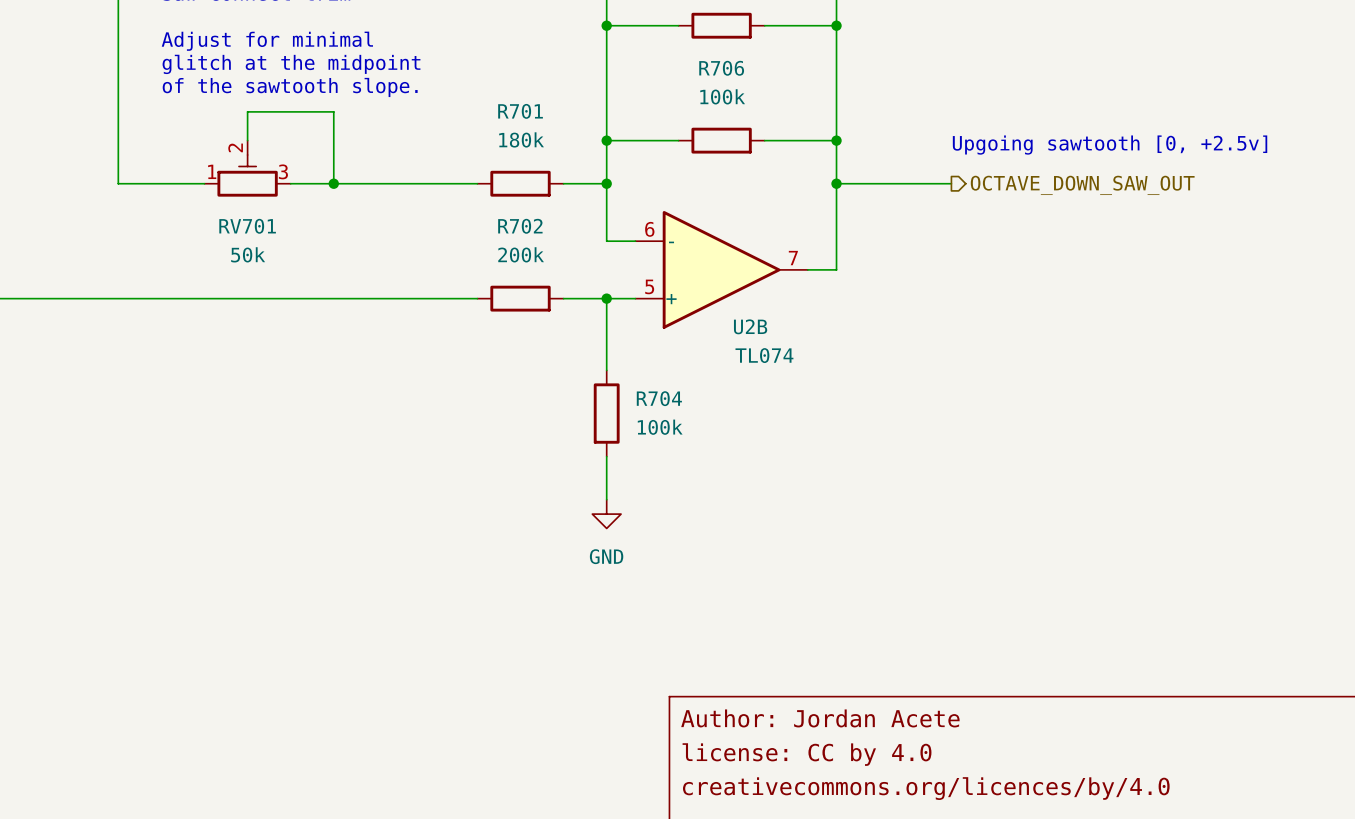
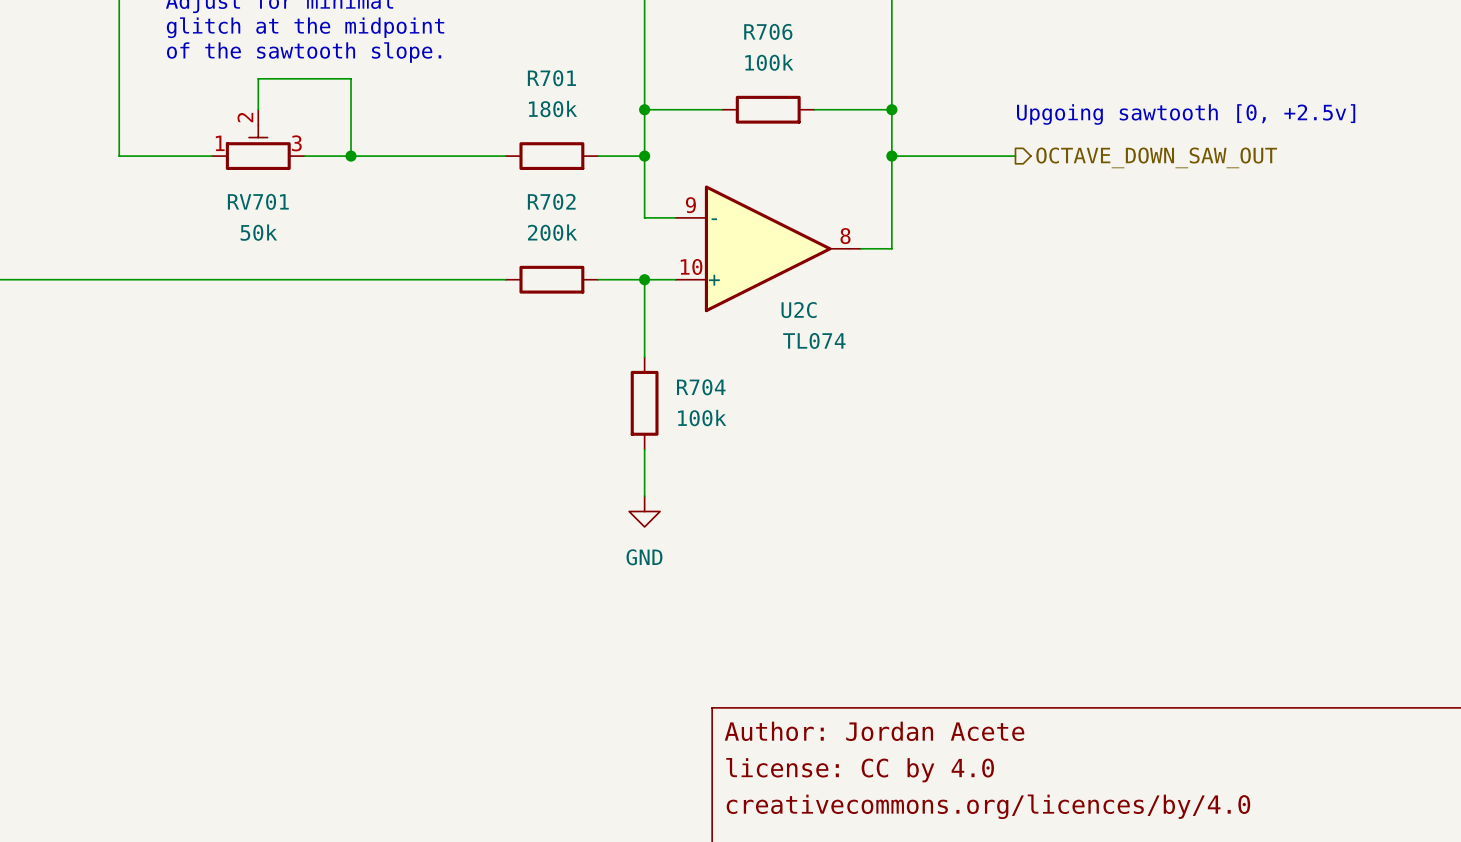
U2B pin number: 6 (649, 229) -> 9 (690, 205)
U2B pin number: 7 (793, 258) -> 8 (845, 236)
U2B pin number: 5 (649, 286) -> 10 (691, 266)
U2B name: U2B (750, 326) -> U2C (799, 310)

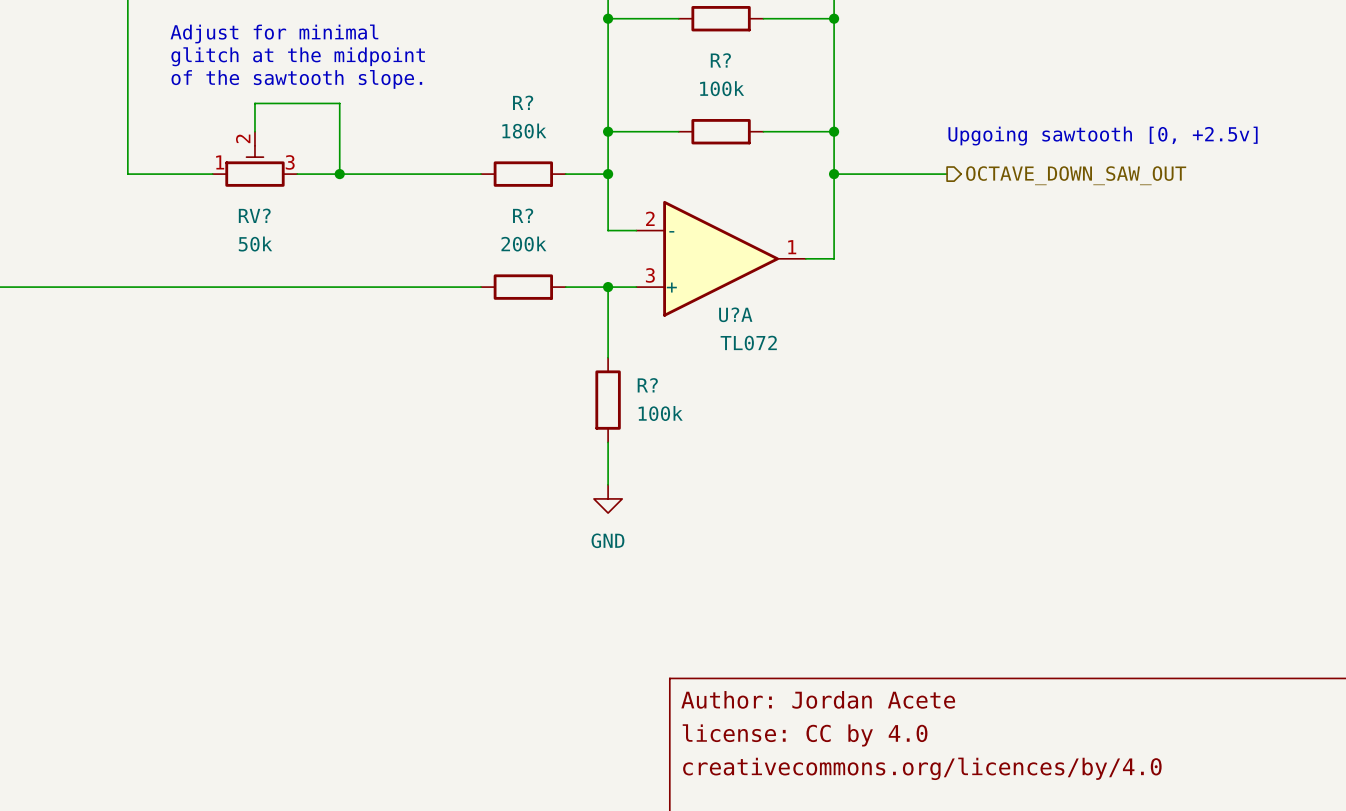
R706 name: R706 (768, 31) -> R? (720, 60)
R701 name: R701 (551, 78) -> R? (523, 102)
RV701 name: RV701 (258, 201) -> RV? (254, 215)
R702 name: R702 (551, 201) -> R? (523, 215)
U2C pin number: 9 (690, 205) -> 2 (650, 218)
U2C pin number: 8 (845, 236) -> 1 (792, 247)
U2C pin number: 10 (691, 266) -> 3 (650, 275)
U2C name: U2C (799, 310) -> U?A (735, 314)
U2C value: TL074 (814, 340) -> TL072 (748, 343)
R704 name: R704 (701, 387) -> R? (647, 385)

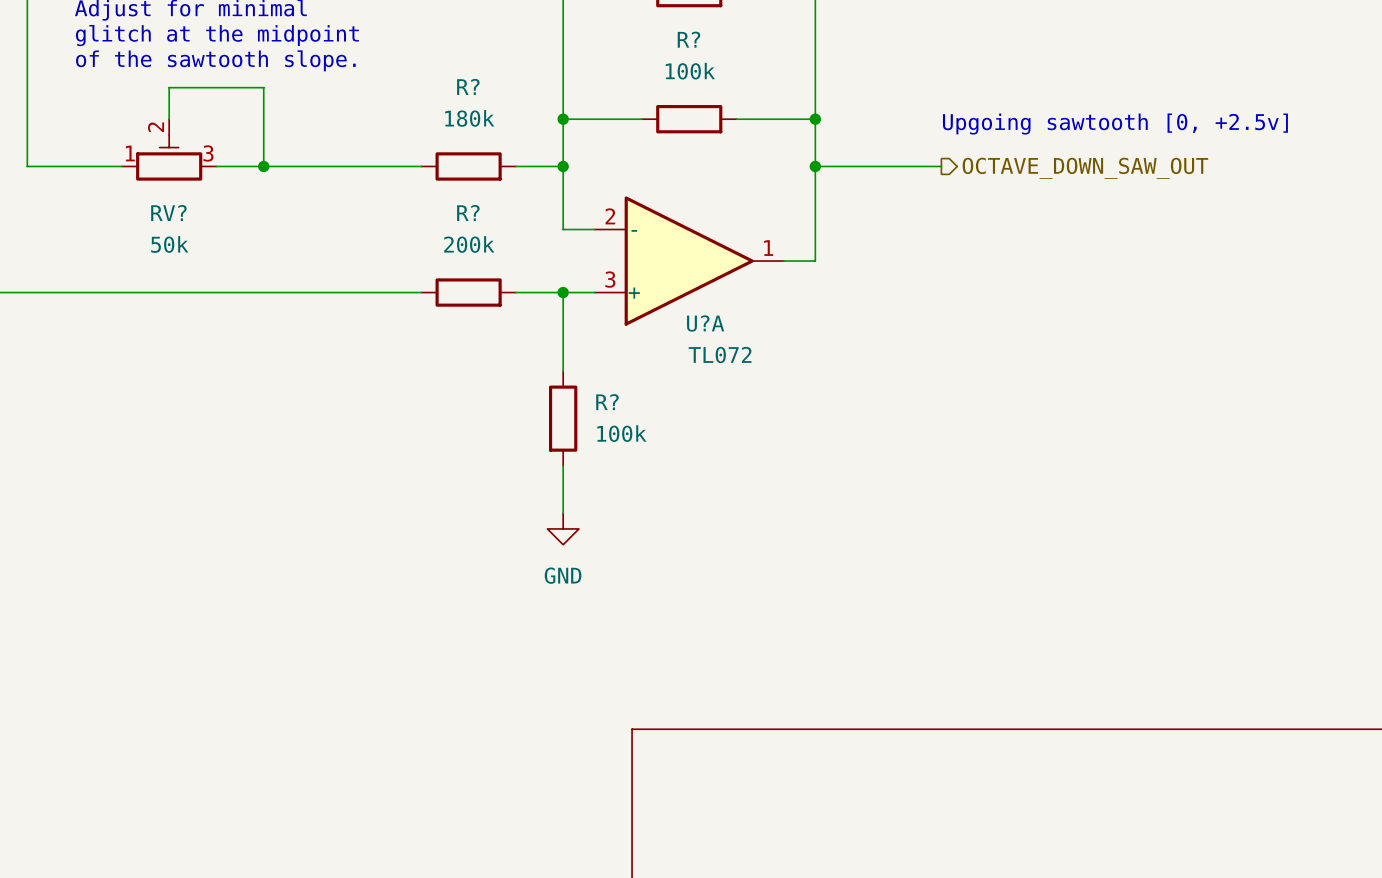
title block: Author: Jordan Acete (818, 699) -> none
title block: license: CC by 4.0 (805, 735) -> none
title block: creativecommons.org/licences/by/4.0 (922, 768) -> none

